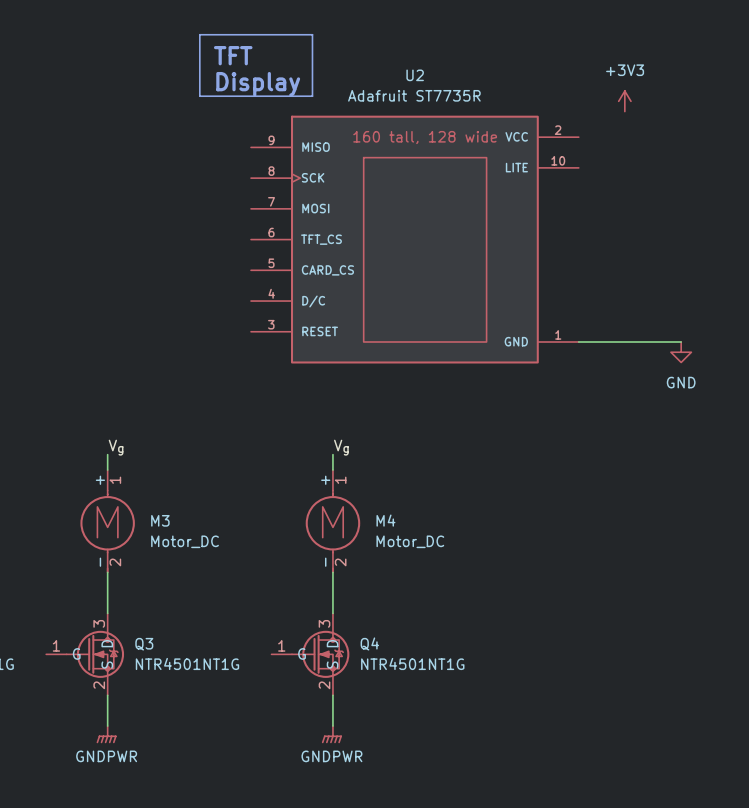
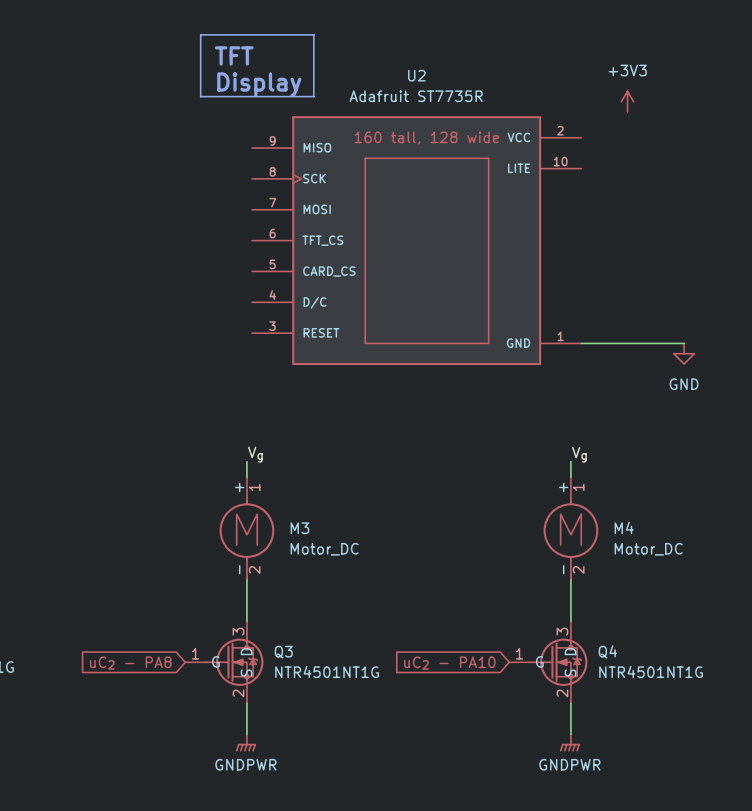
label: Vg (116, 447) -> none
label: Vg (341, 447) -> none
label: none -> Vg (255, 454)
label: none -> Vg (579, 454)
wire: (107, 454) (107, 470) -> none
wire: (332, 454) (332, 470) -> (246, 461) (246, 477)
wire: none -> (570, 461) (570, 477)
M3 position: (107, 521) -> (246, 528)
M4 position: (332, 521) -> (570, 528)
wire: (107, 572) (107, 613) -> none
wire: (332, 572) (332, 613) -> (246, 580) (246, 621)
wire: none -> (570, 580) (570, 621)
Q3 position: (85, 654) -> (224, 662)
Q4 position: (310, 654) -> (548, 662)
global label: none -> uC2 - PA8 (130, 663)
global label: none -> uC2 - PA10 (449, 663)
wire: (107, 695) (107, 726) -> none
wire: (332, 695) (332, 726) -> (246, 703) (246, 734)
wire: none -> (570, 703) (570, 734)
power symbol: GNDPWR (106, 734) -> none
power symbol: GNDPWR (331, 734) -> none
power symbol: none -> GNDPWR (245, 742)
power symbol: none -> GNDPWR (569, 742)

